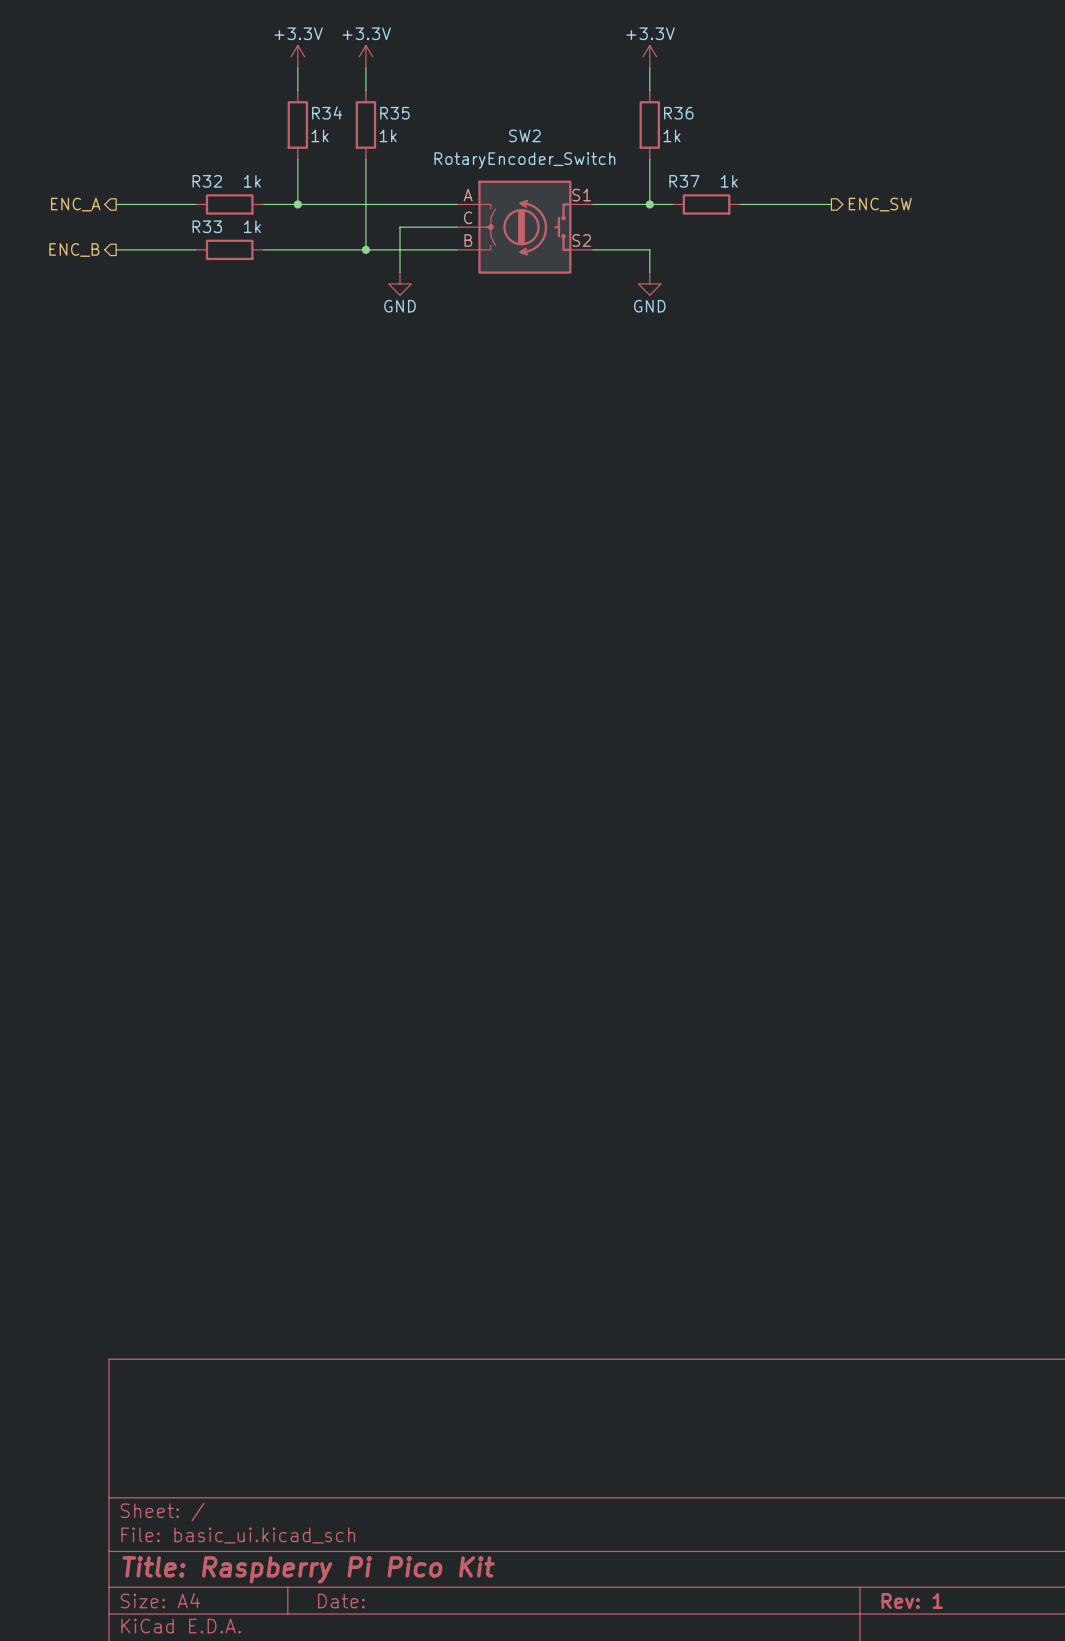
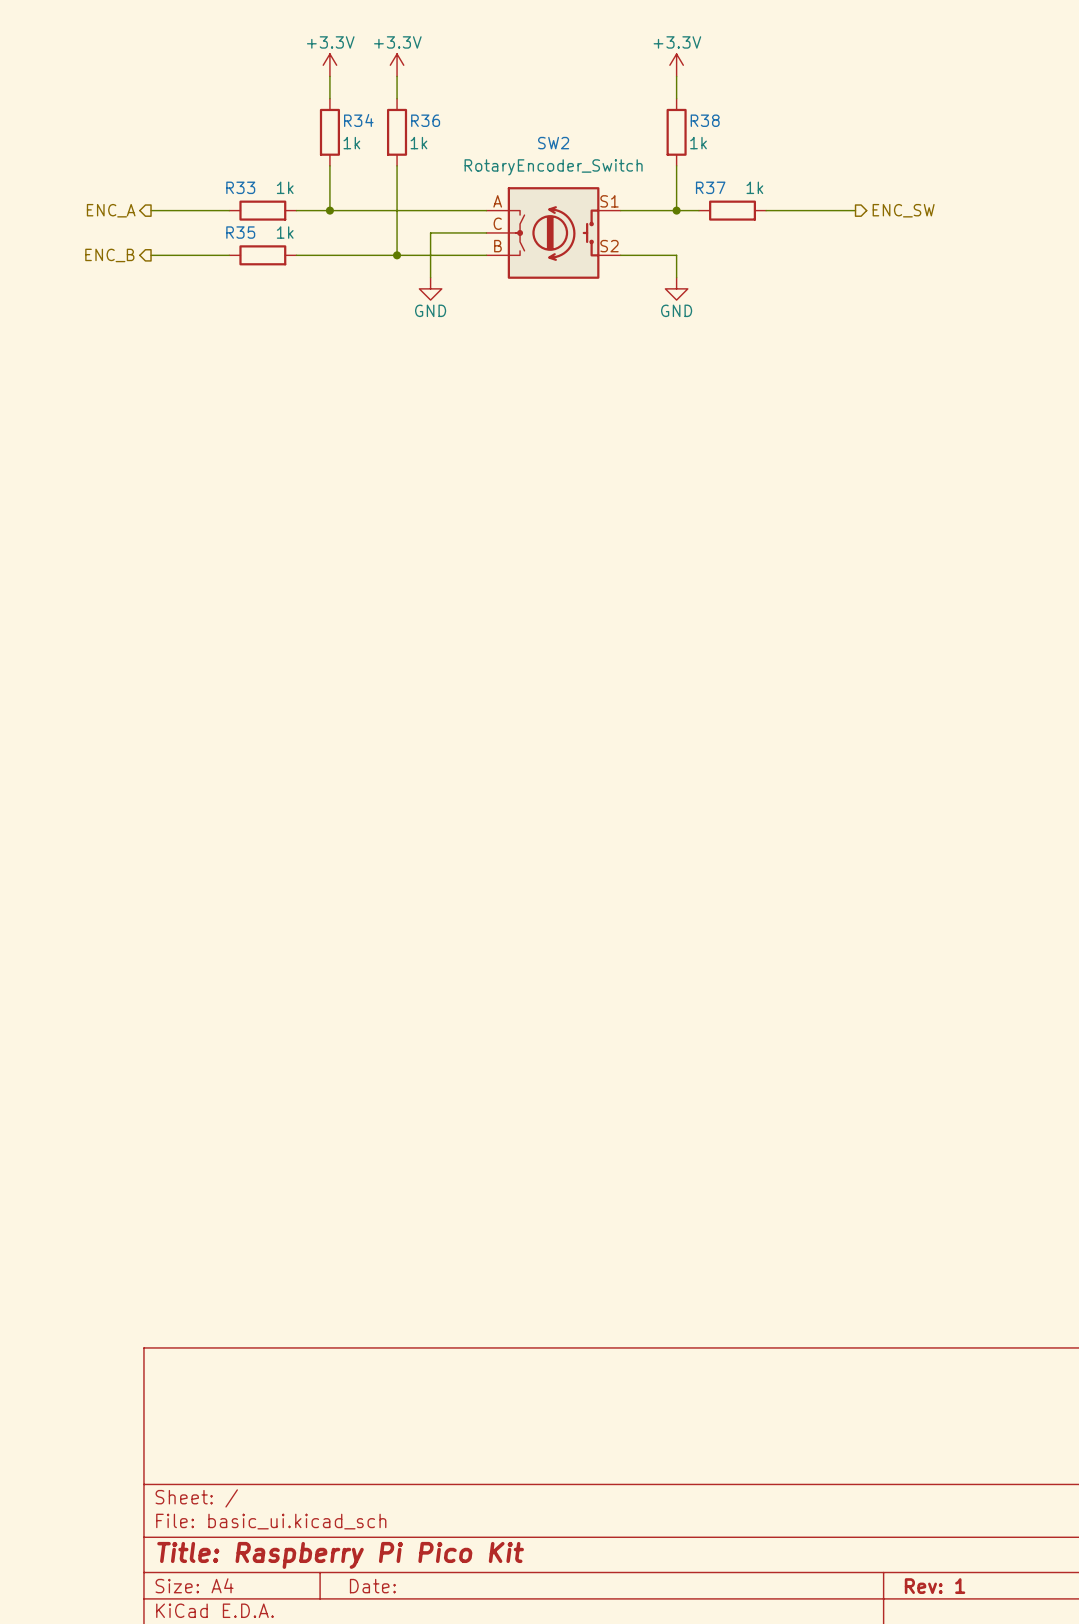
R35 name: R35 (394, 113) -> R36 (425, 120)
R36 name: R36 (678, 113) -> R38 (705, 120)
R32 name: R32 (207, 181) -> R33 (240, 187)
R33 name: R33 (207, 226) -> R35 (240, 232)

